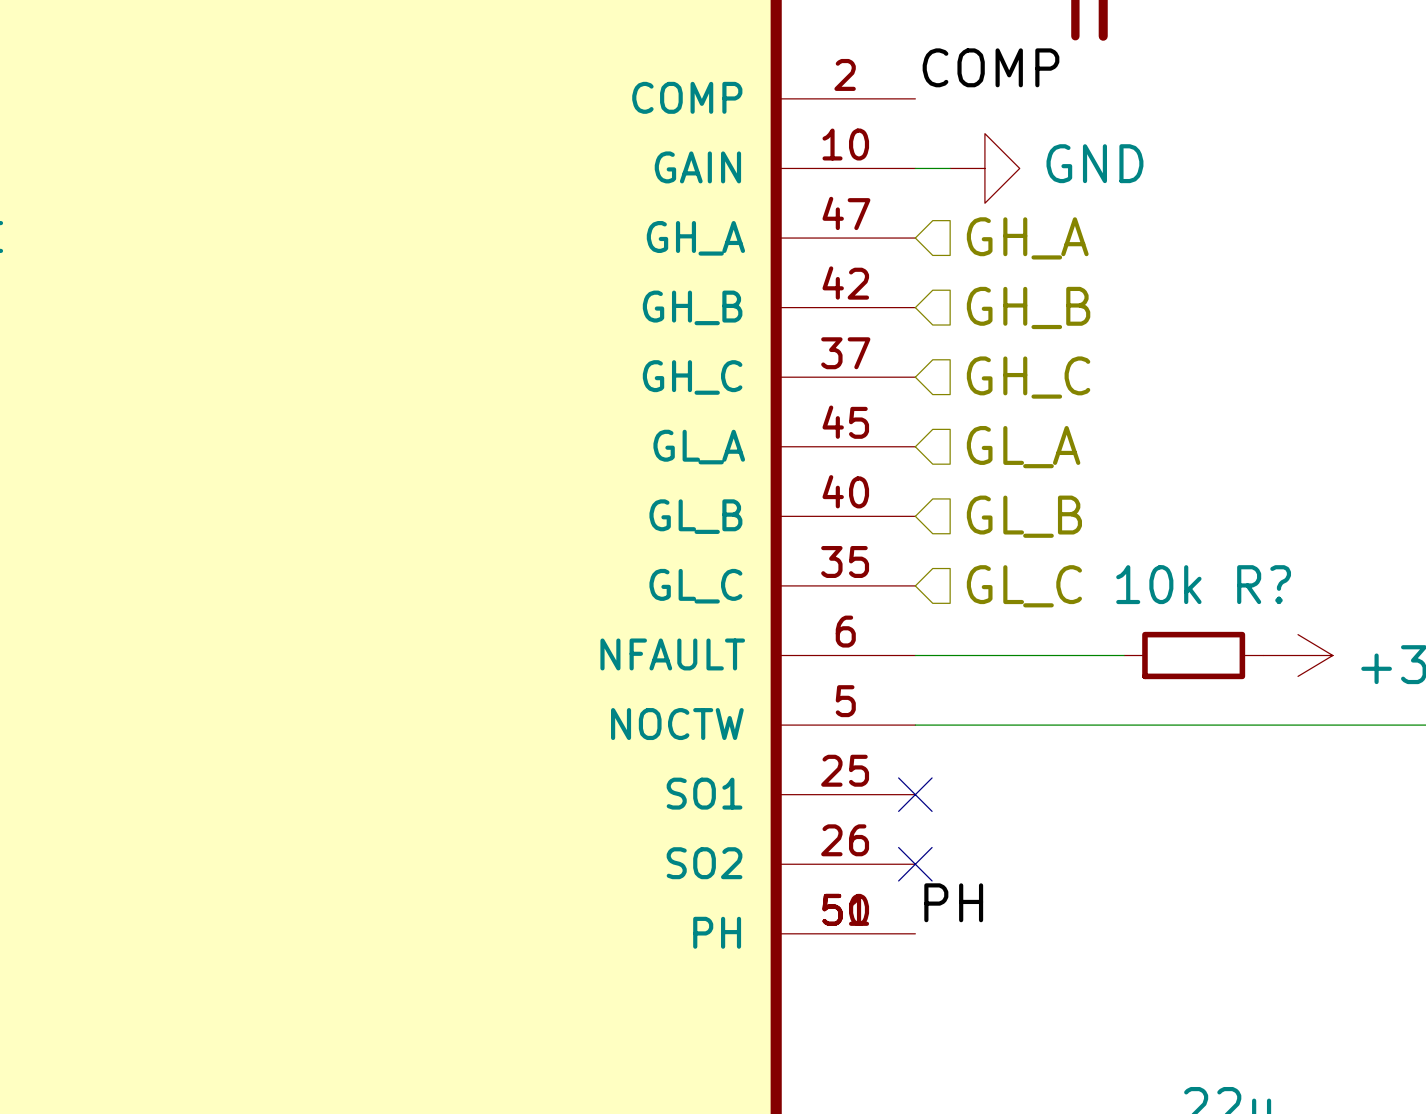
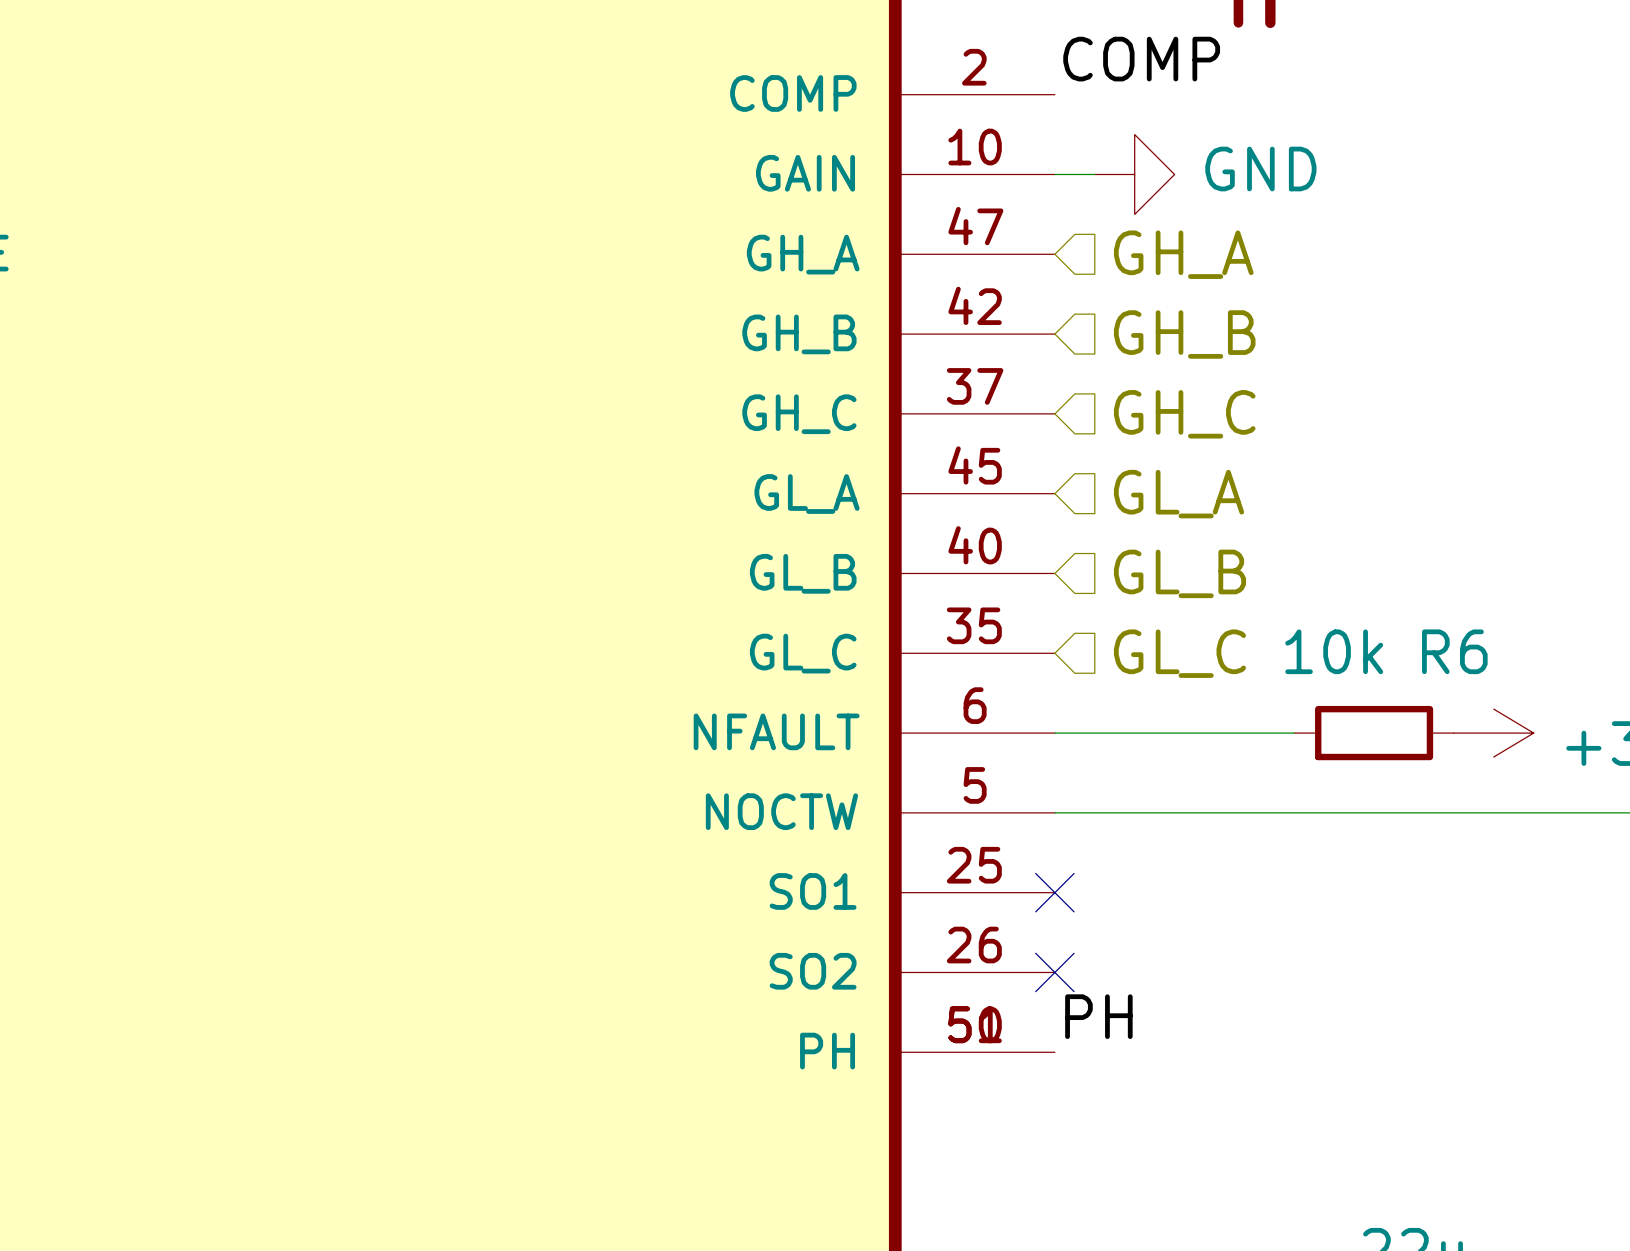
R? name: R? (1264, 584) -> R6 (1454, 651)

